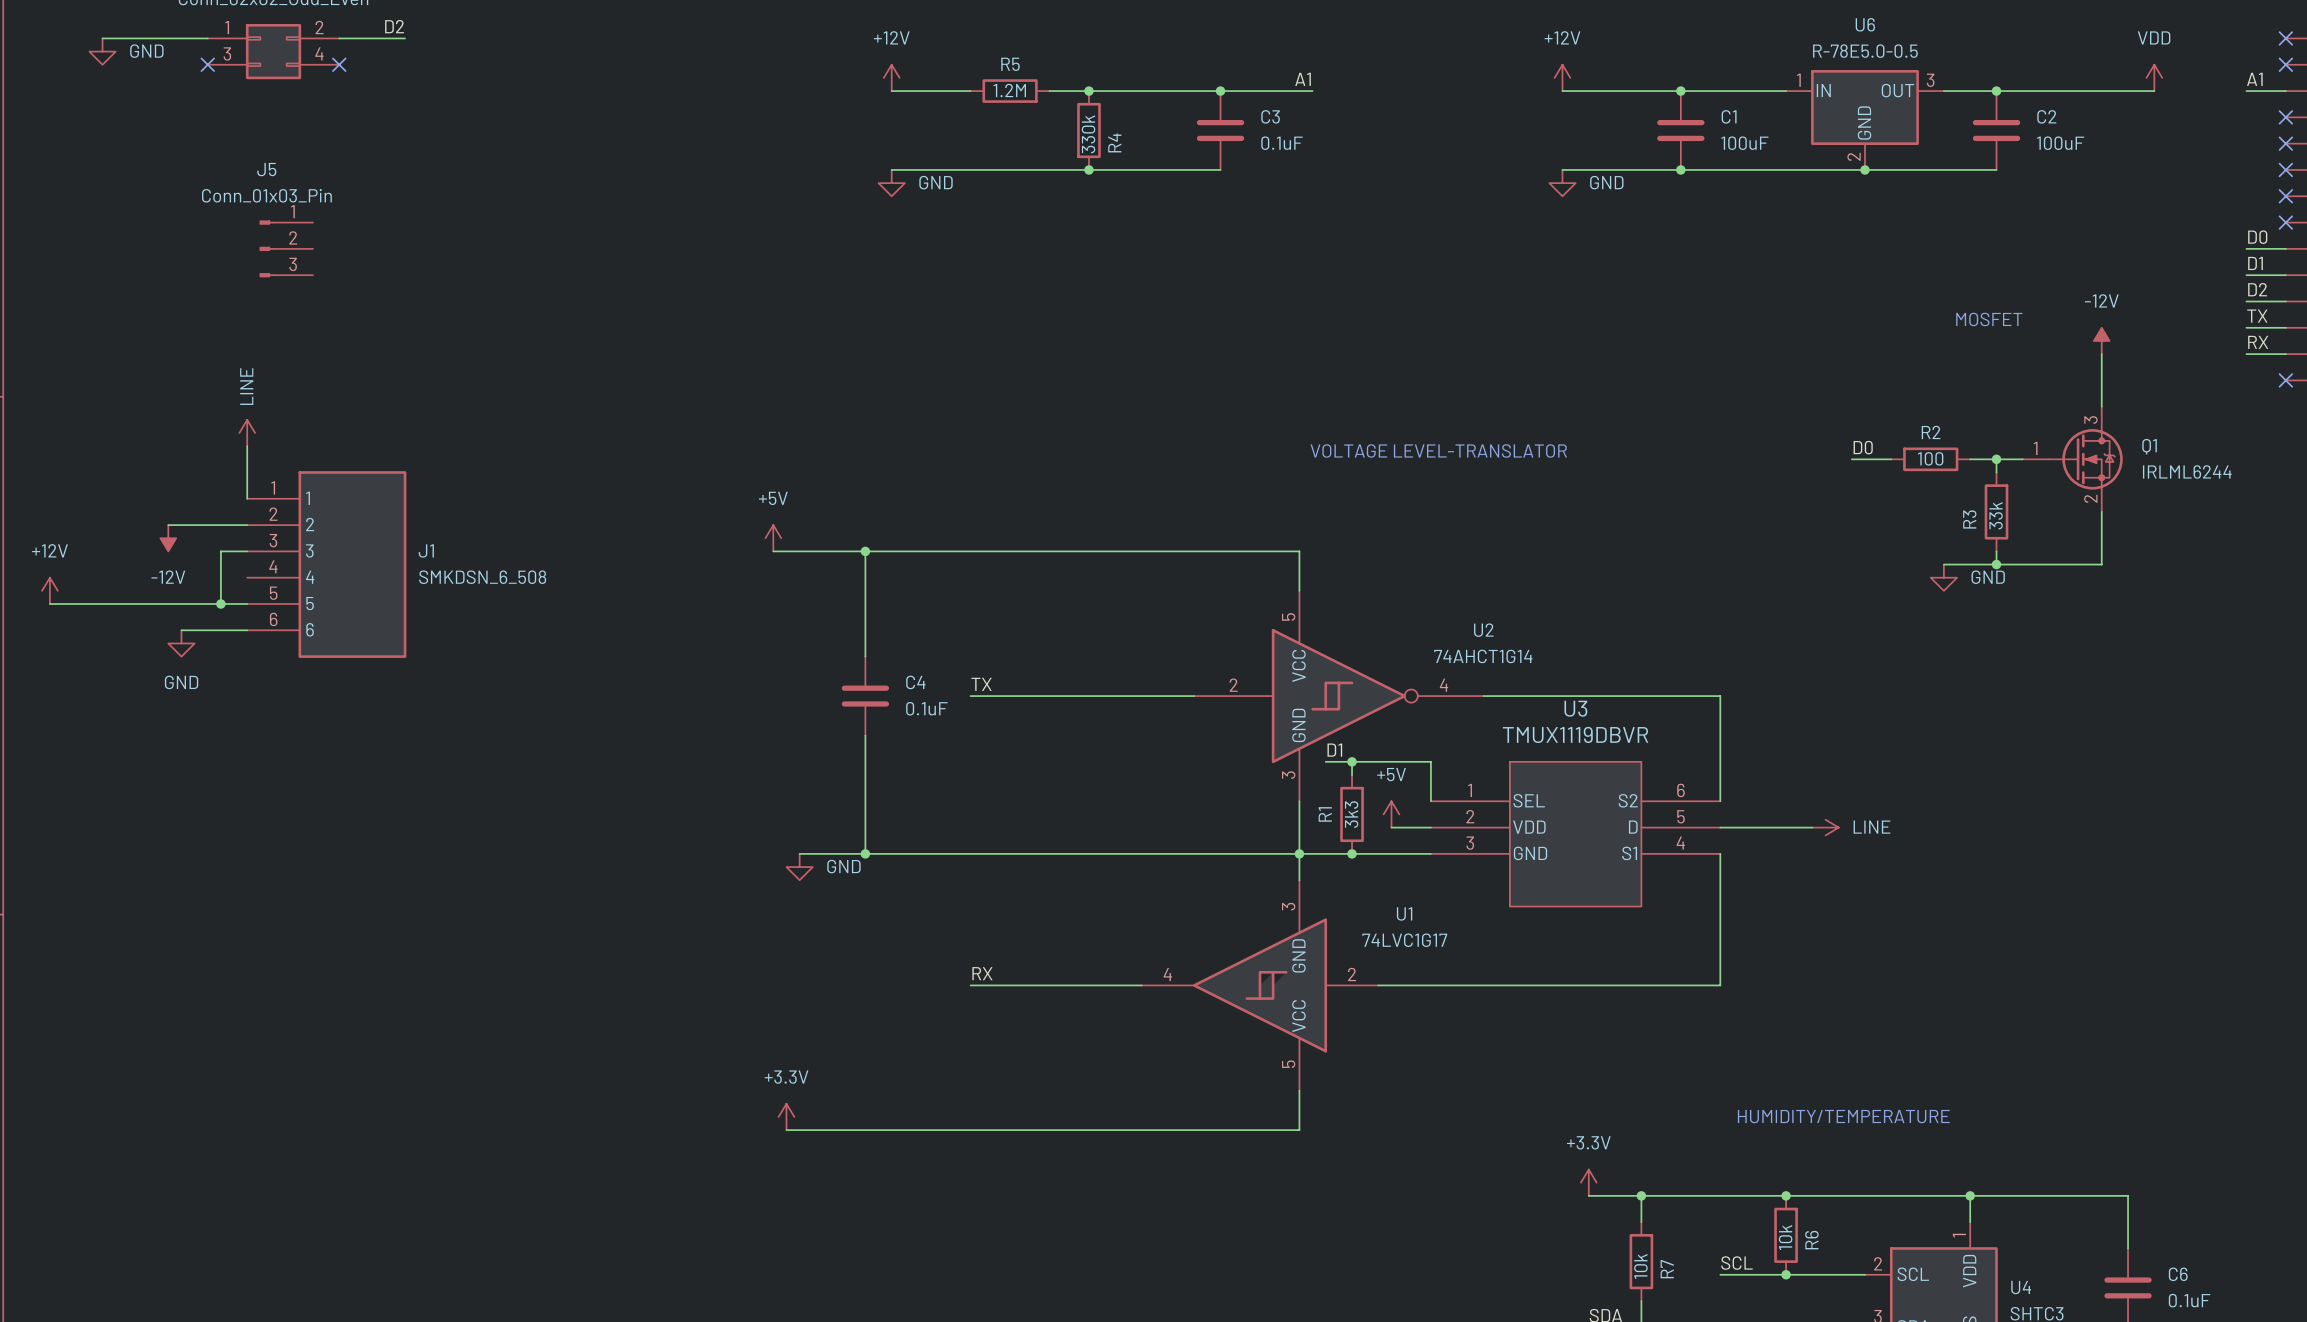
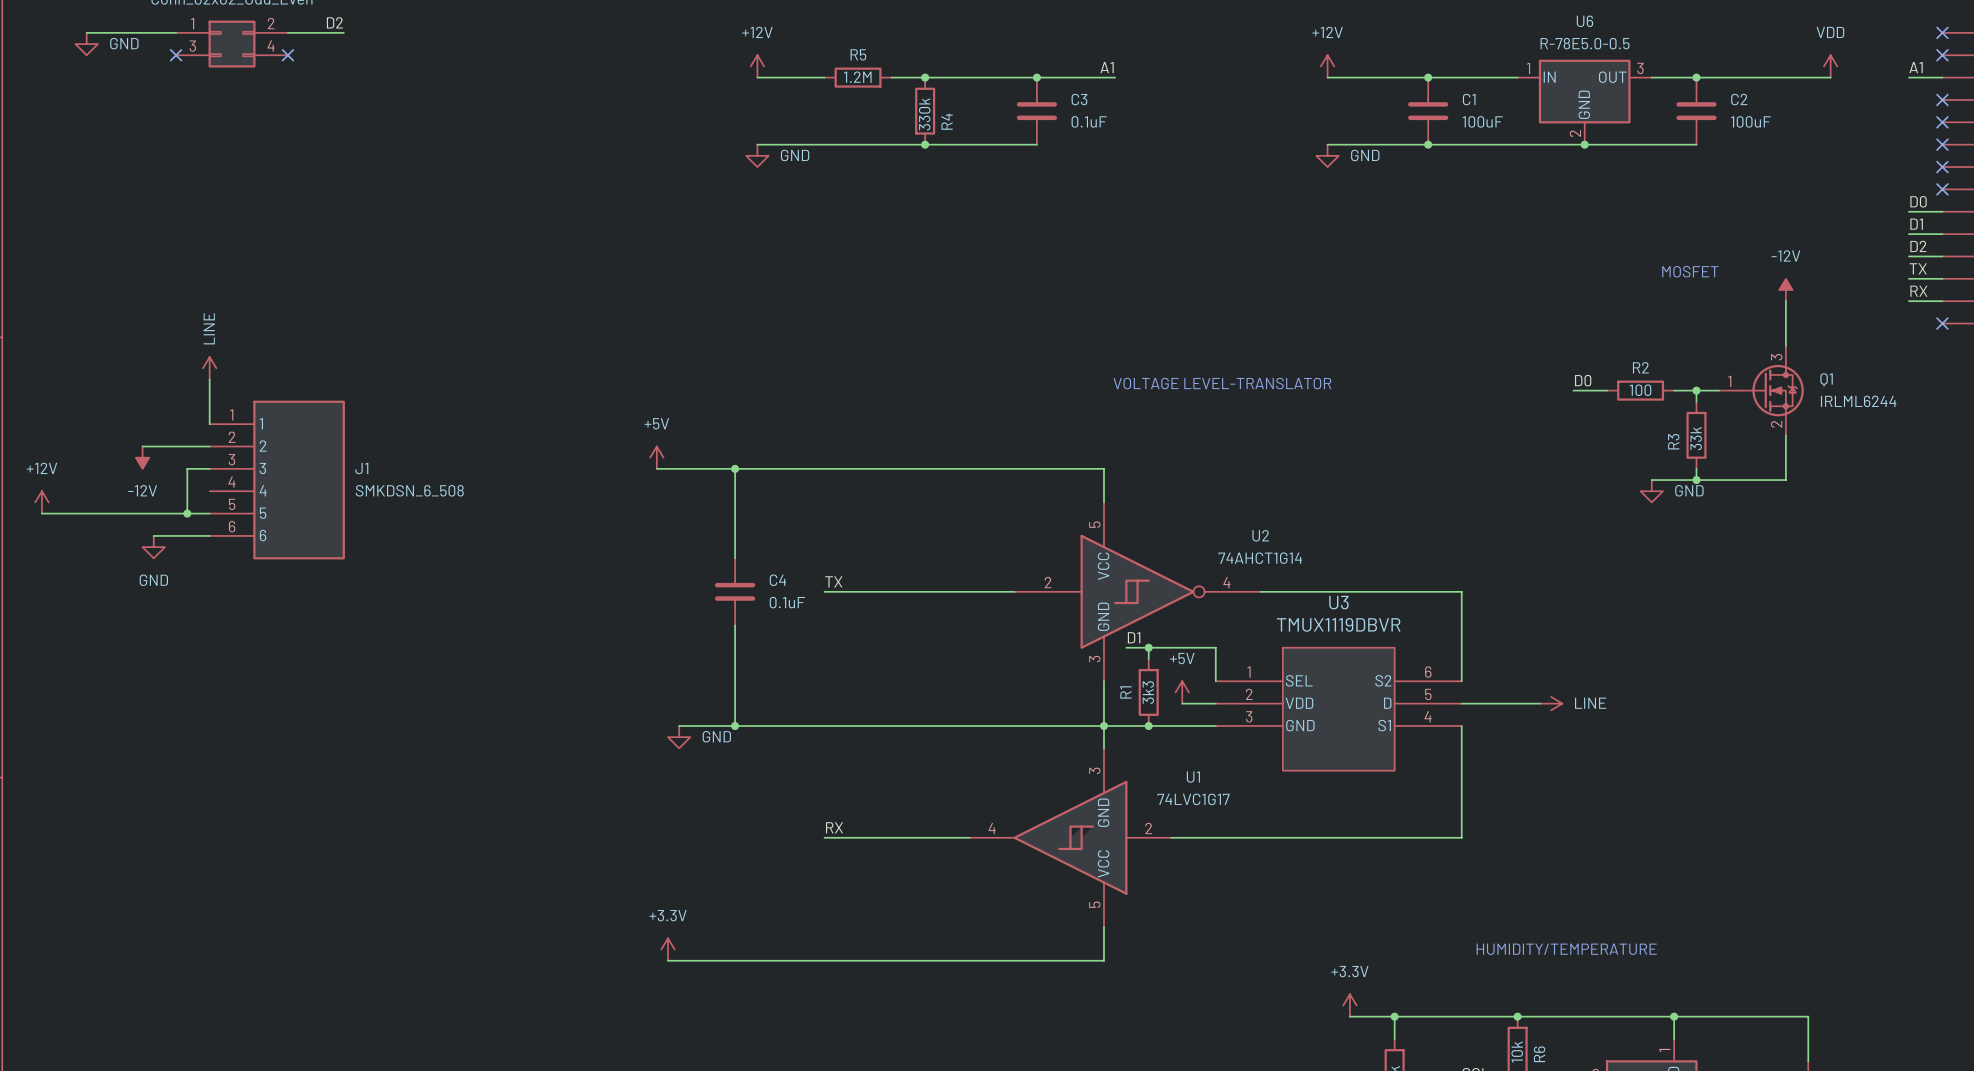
J5: Conn_01x03_Pin (286, 248) -> none

